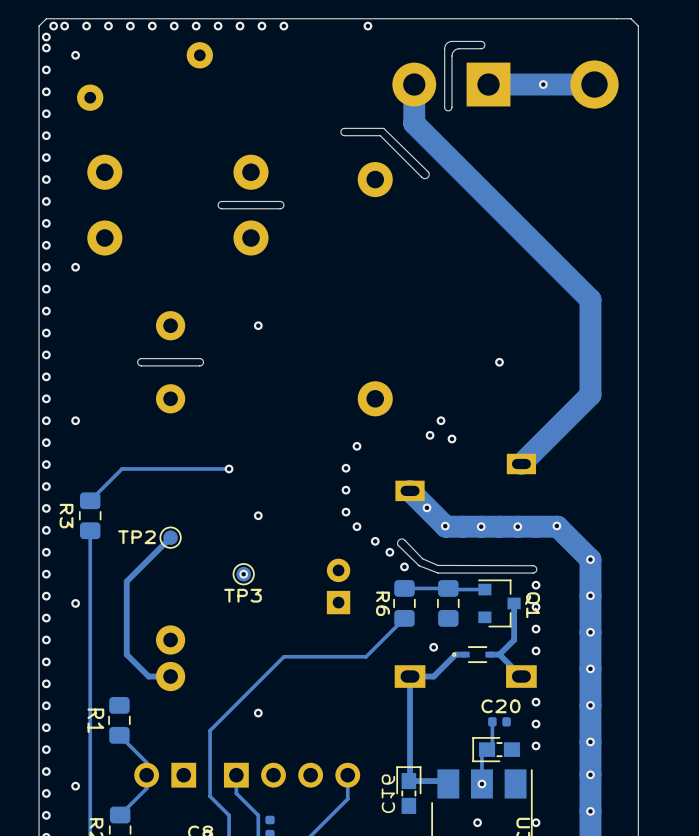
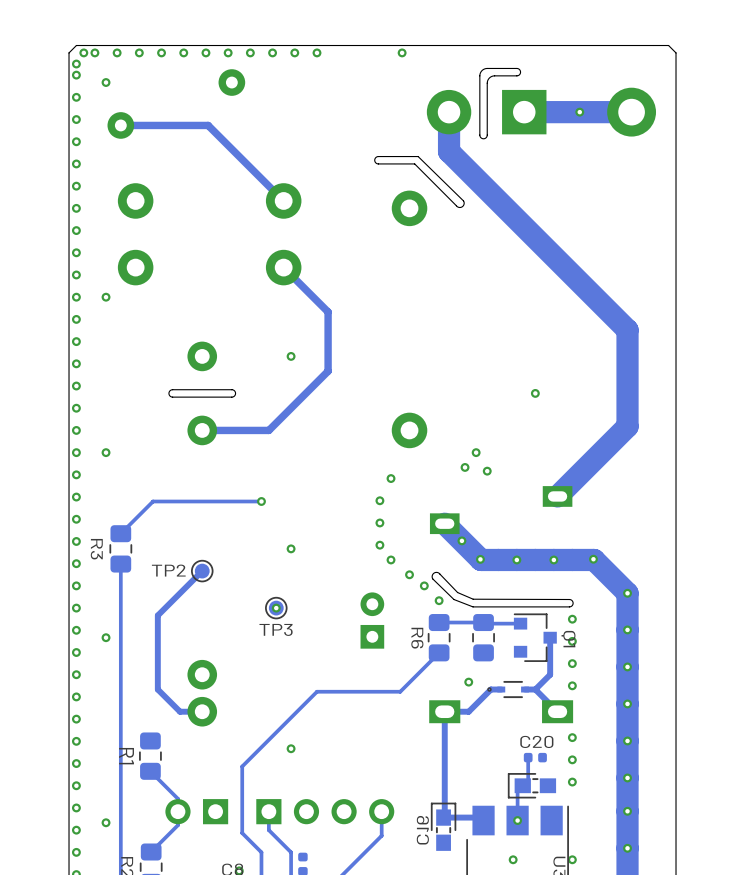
track: none -> (120, 125) (208, 125) (283, 200)
board edge: (280, 201) (221, 201) (218, 205) (221, 208) (280, 208) (283, 205) (280, 201) -> none
track: none -> (283, 267) (328, 312) (328, 371) (268, 430) (202, 430)

